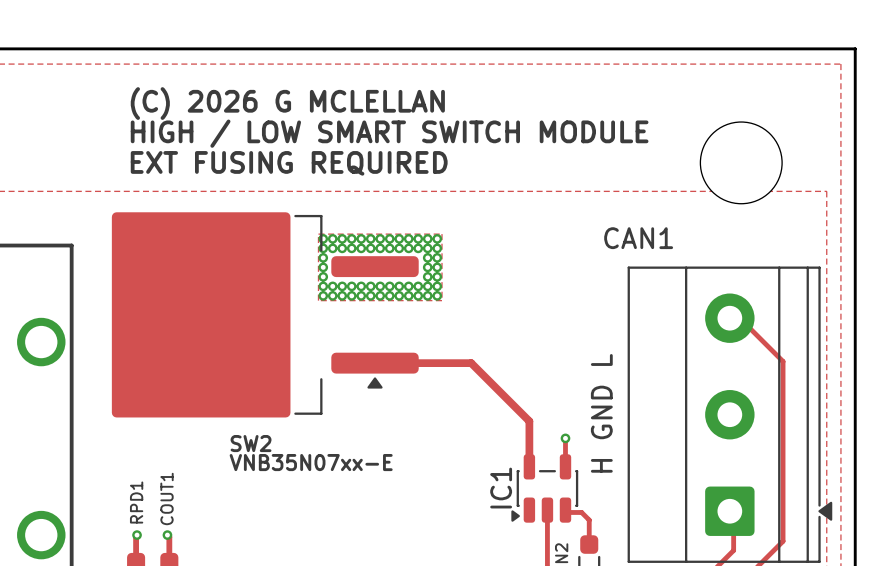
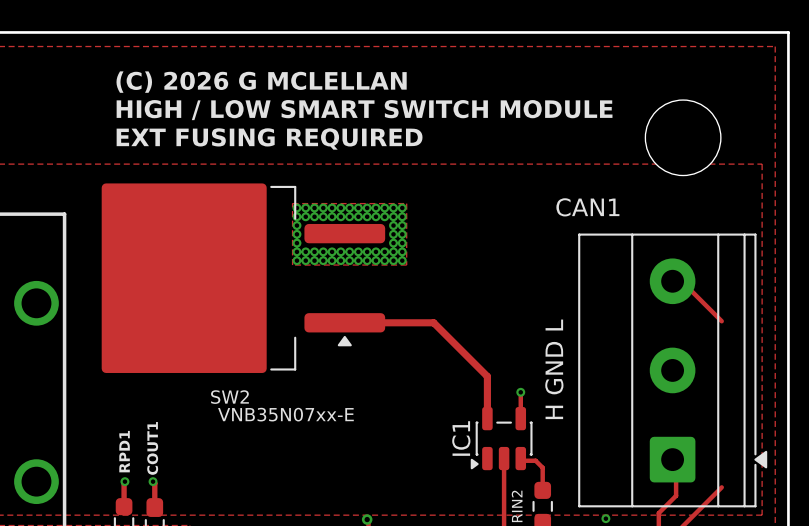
track: (783, 361) (783, 541) -> none

